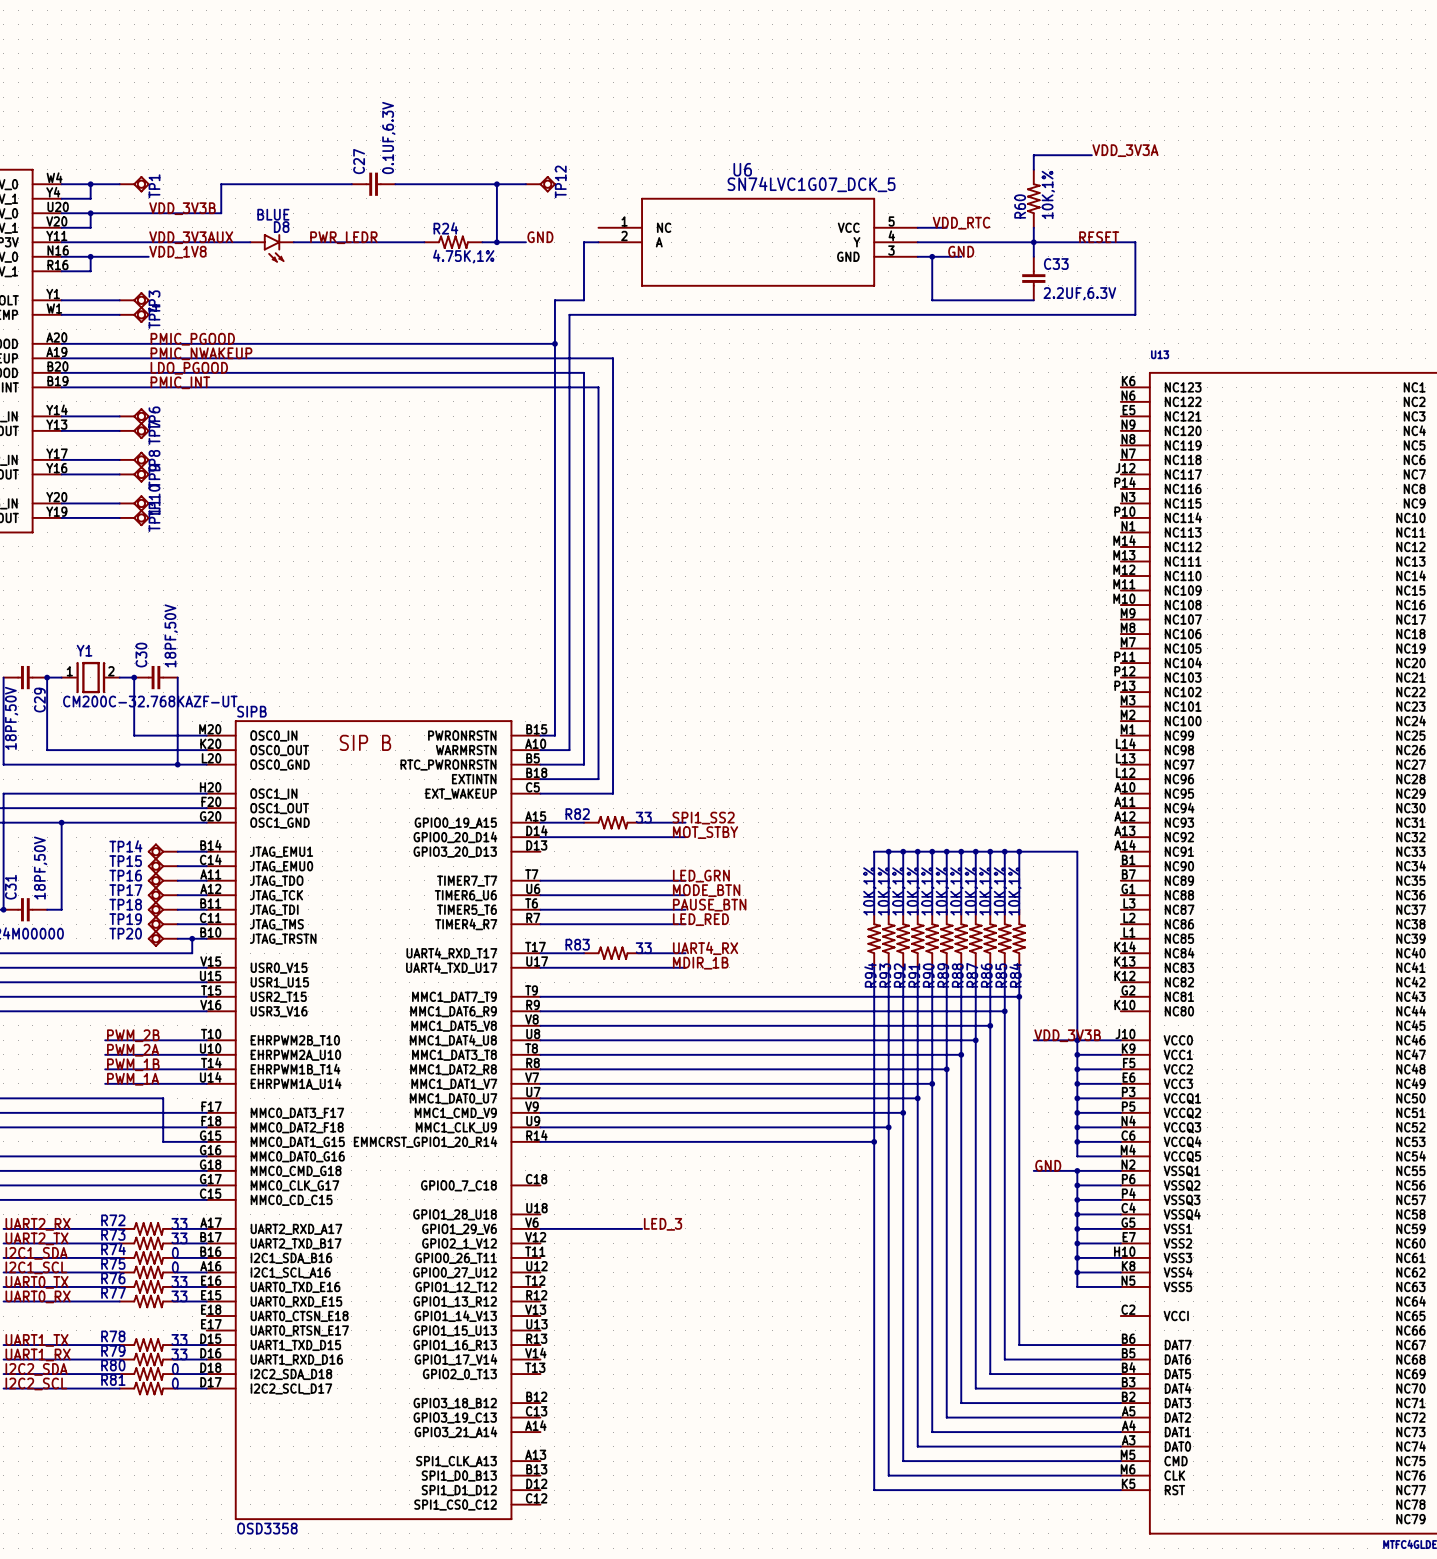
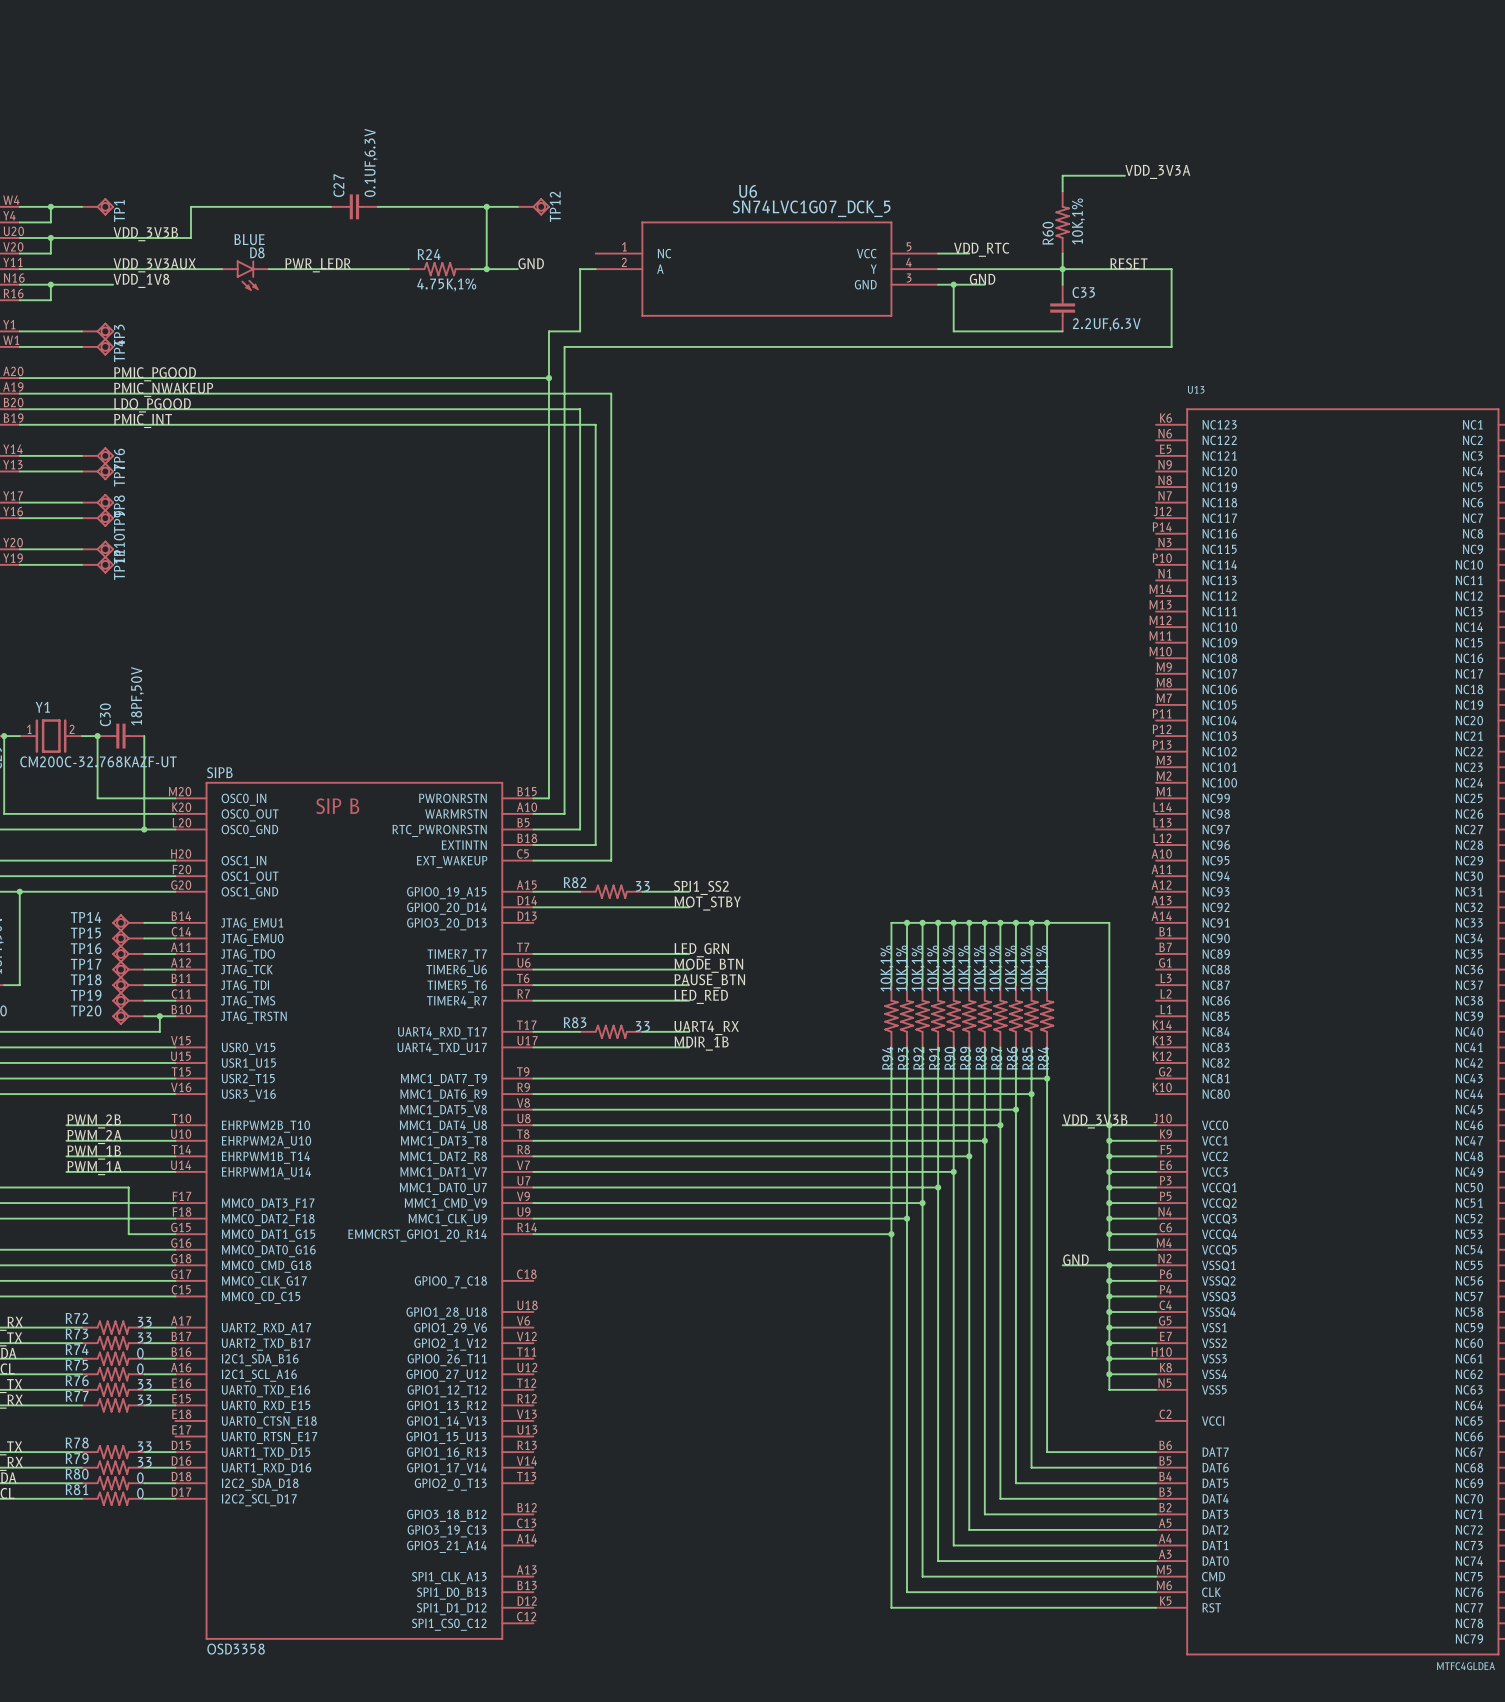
label: LED_3 (663, 1224) -> none
wire: (540, 1228) (642, 1228) -> none

